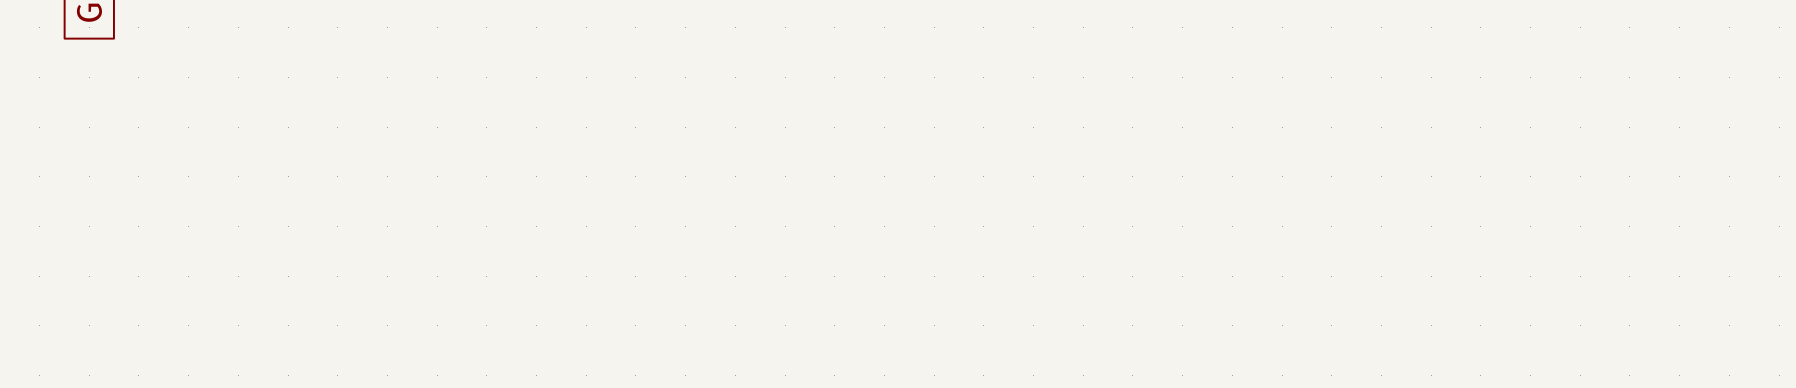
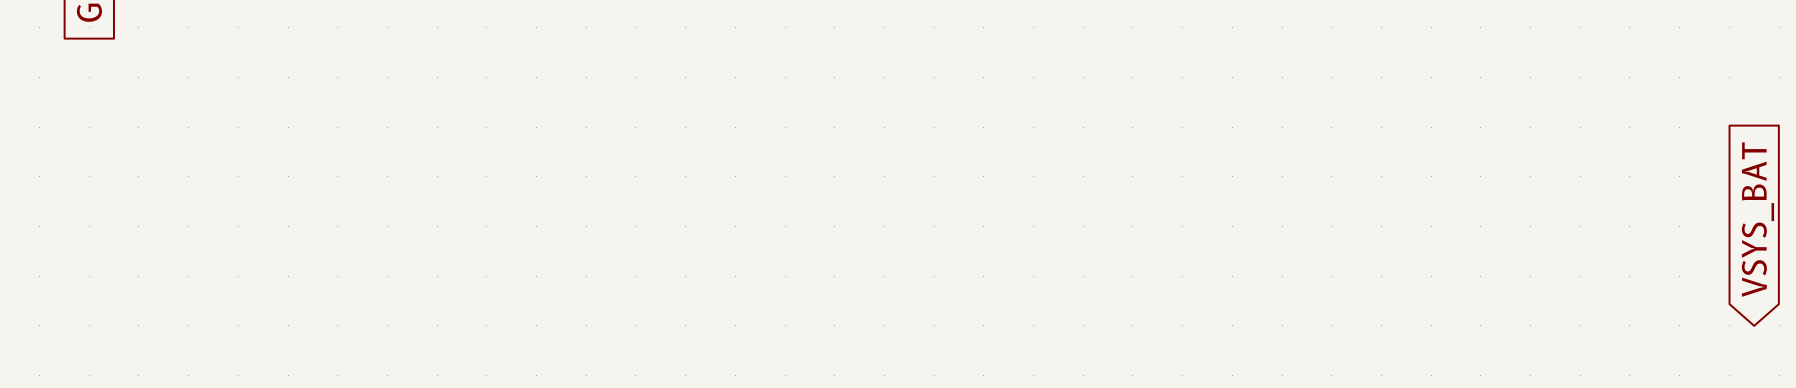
global label: none -> VSYS_BAT (1757, 219)

